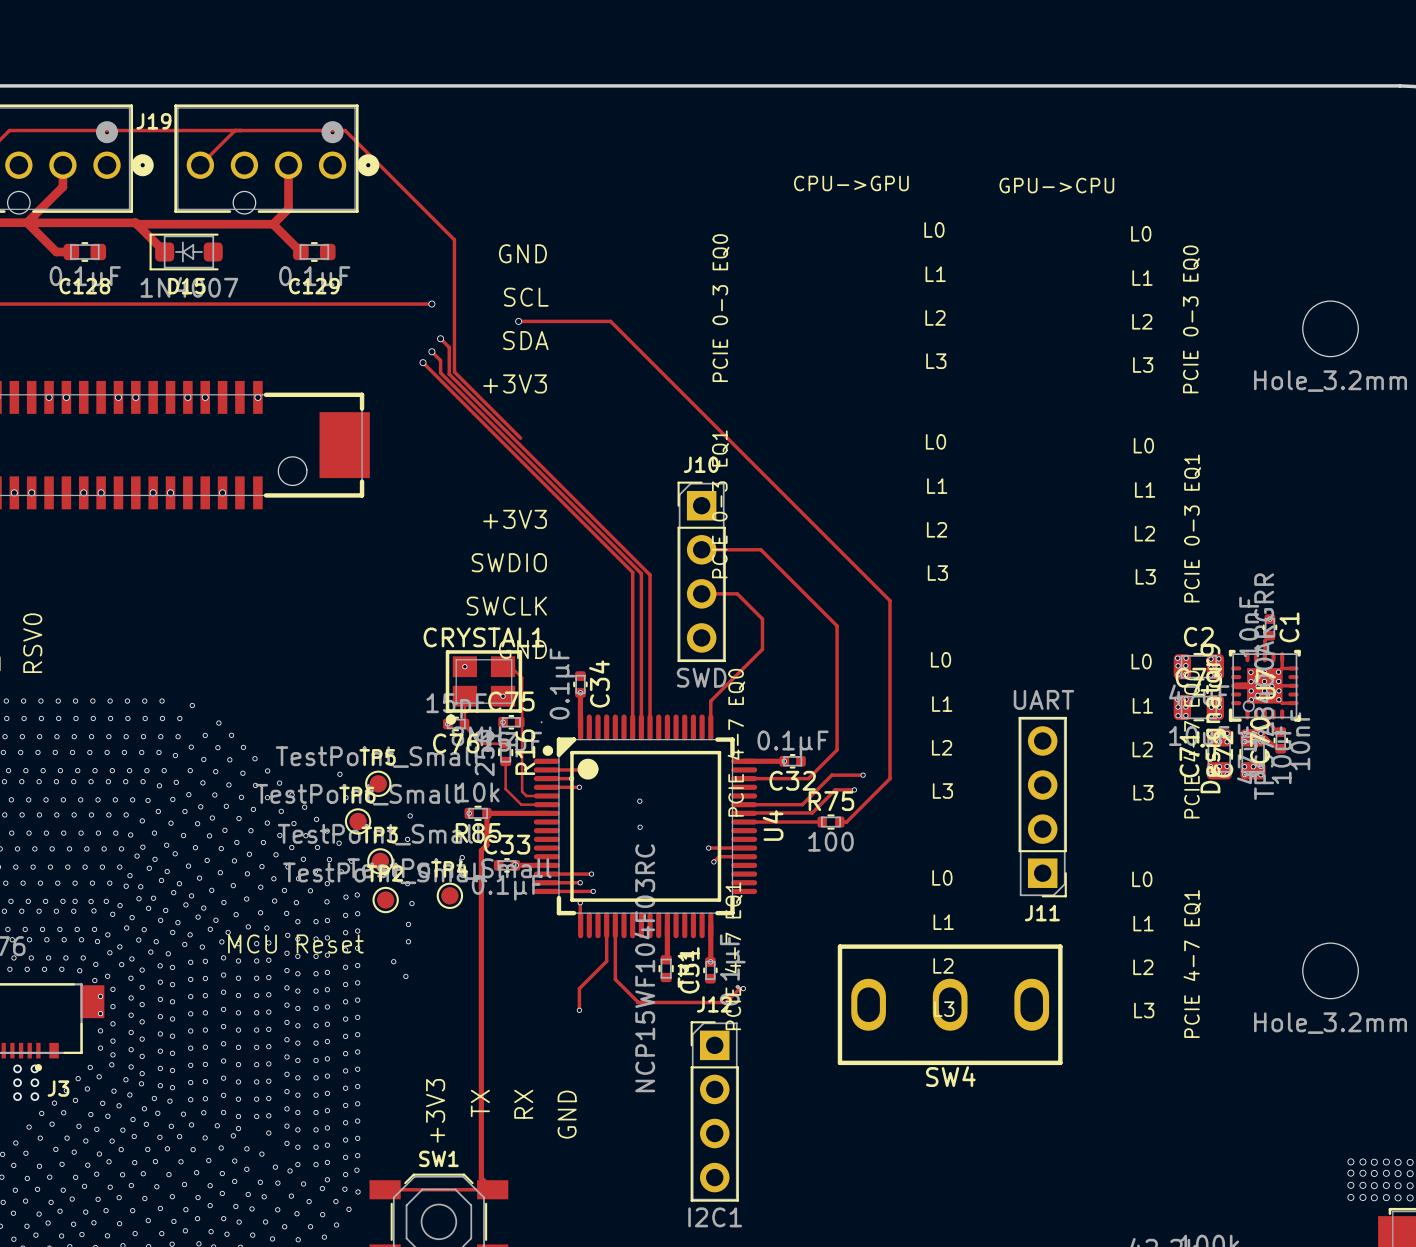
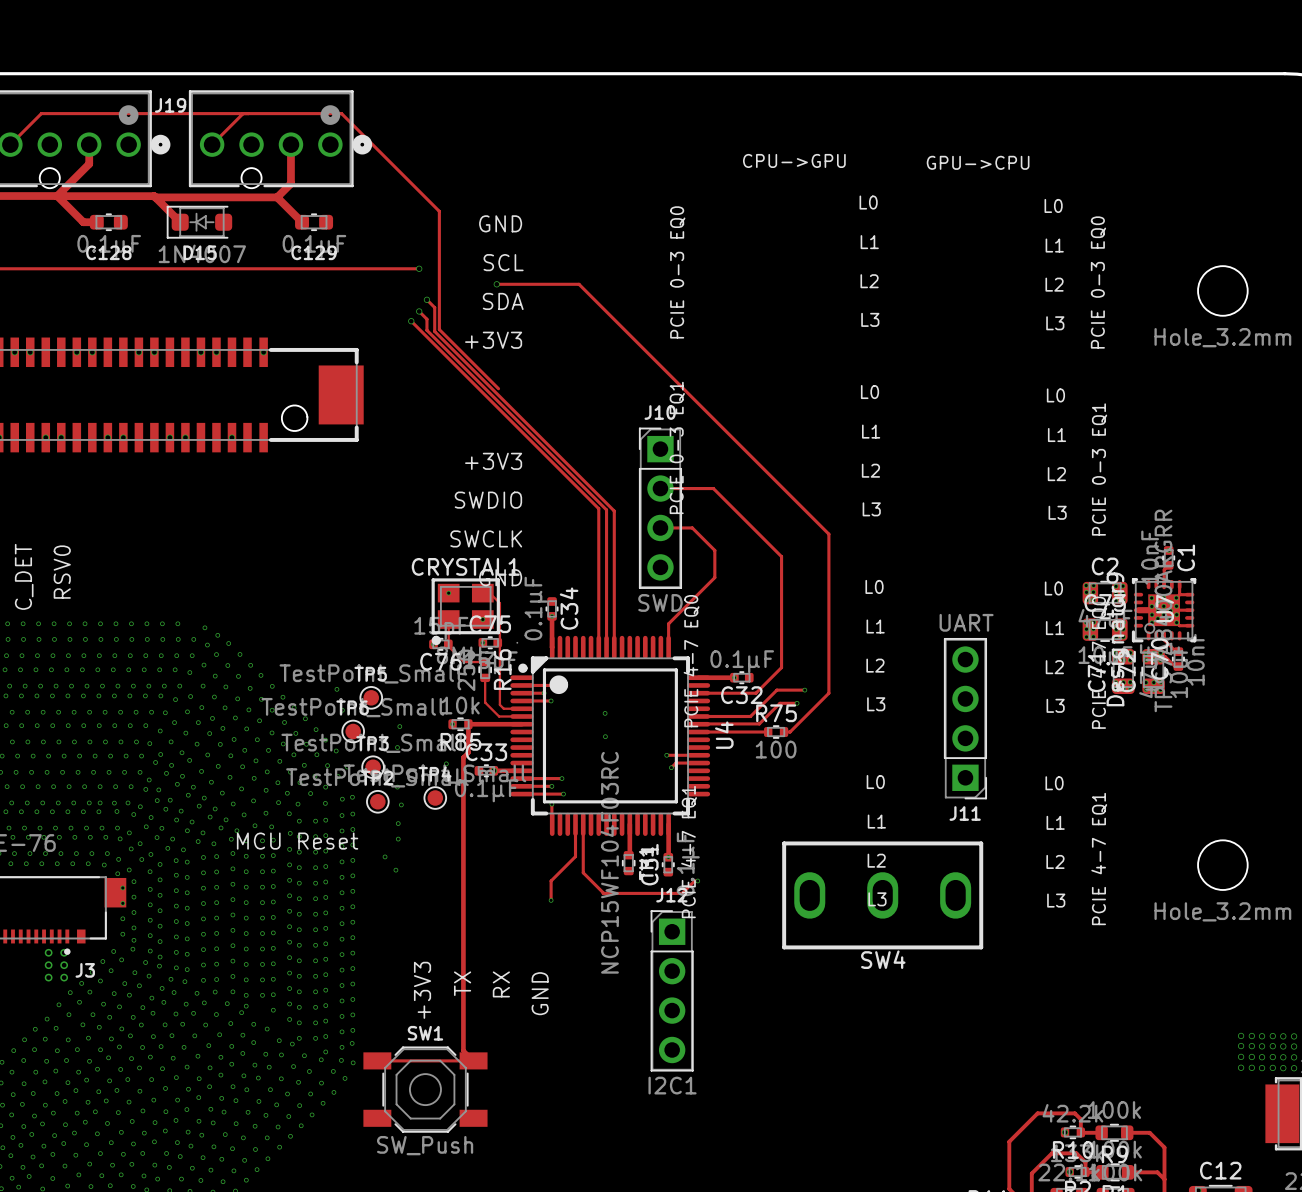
via: none -> (217, 635)
via: none -> (207, 645)

